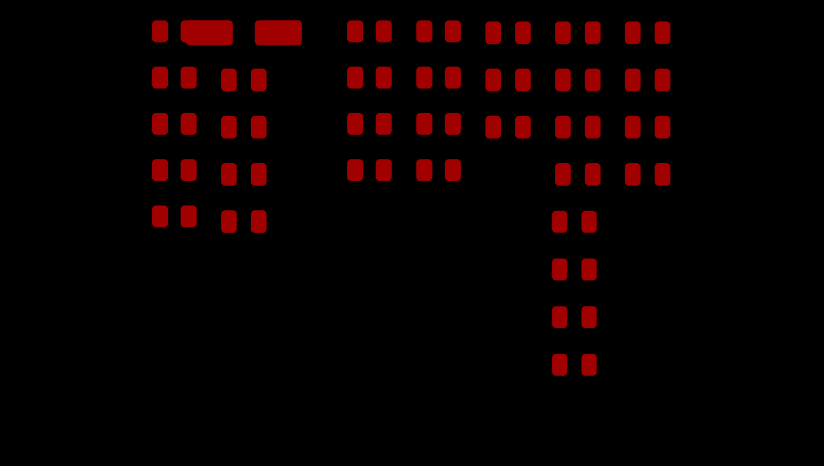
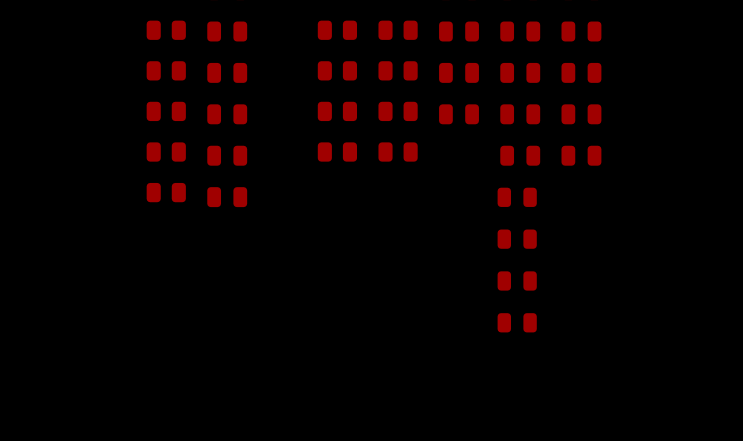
part footprint: [185, 20, 302, 46] -> [207, 21, 248, 42]

